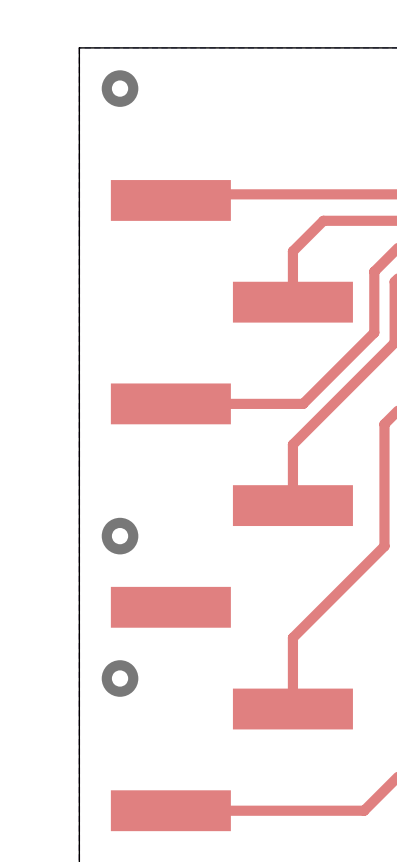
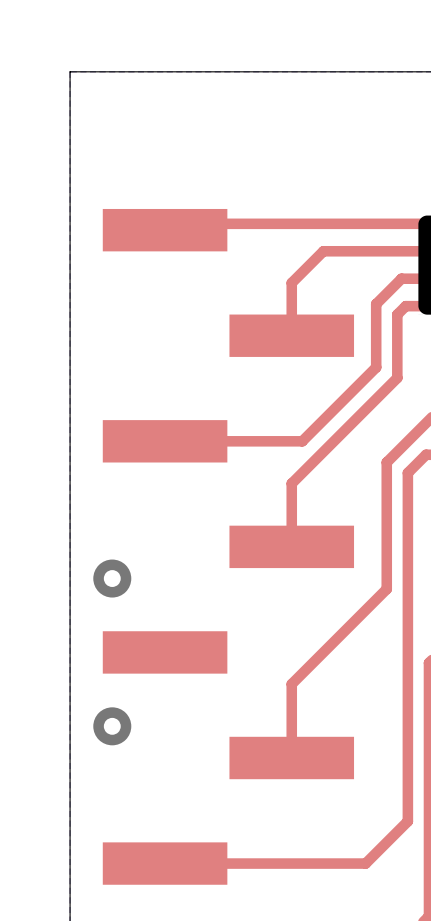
via: (120, 88) -> none

